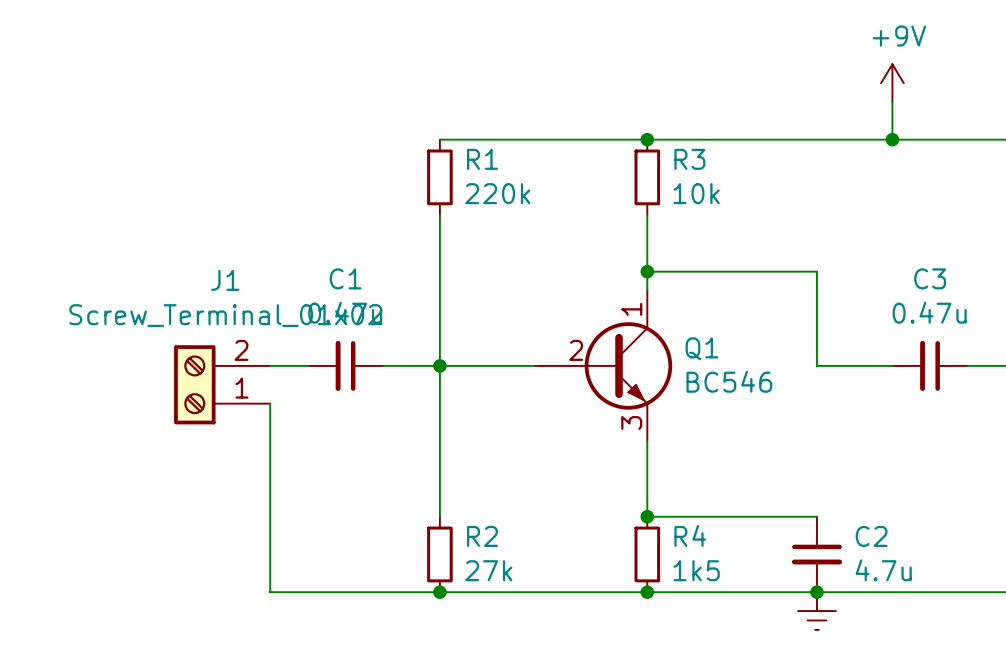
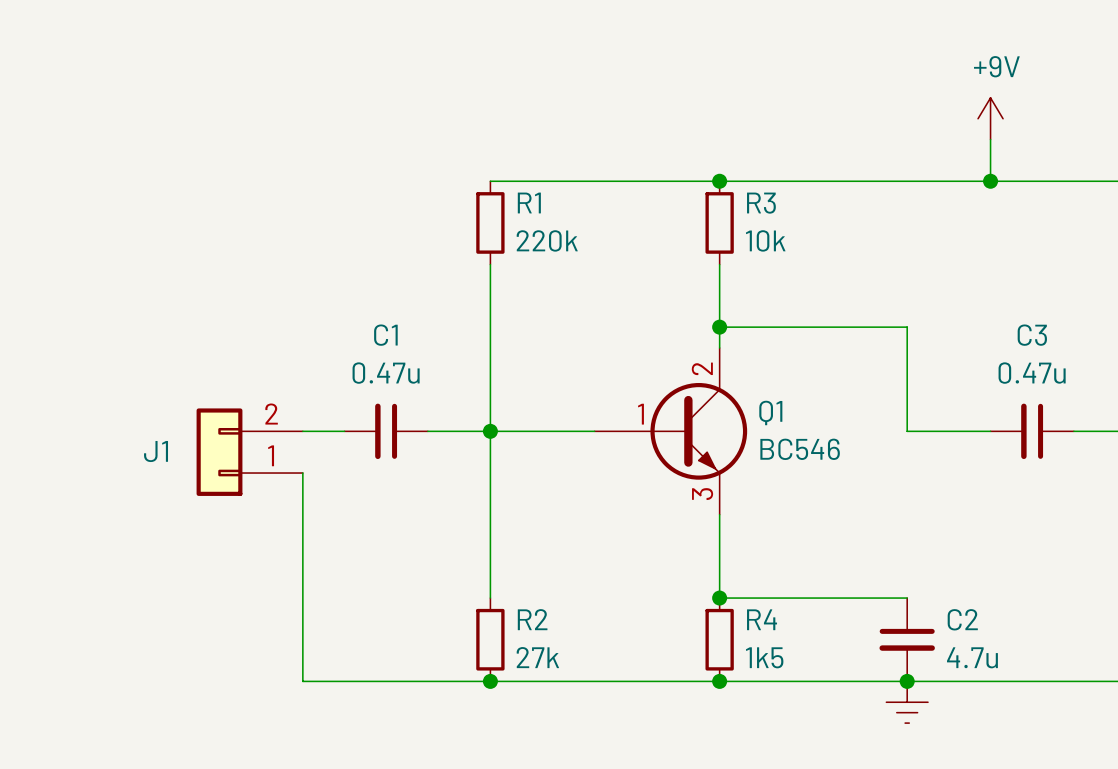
J1 name position: J1 (225, 280) -> J1 (156, 451)
Q1 pin number: 1 (631, 309) -> 2 (702, 368)
J1 value: Screw_Terminal_01x02 (225, 315) -> none
J1 symbol: [174, 345, 271, 425] -> [196, 408, 303, 496]
Q1 pin number: 2 (576, 350) -> 1 (640, 414)

